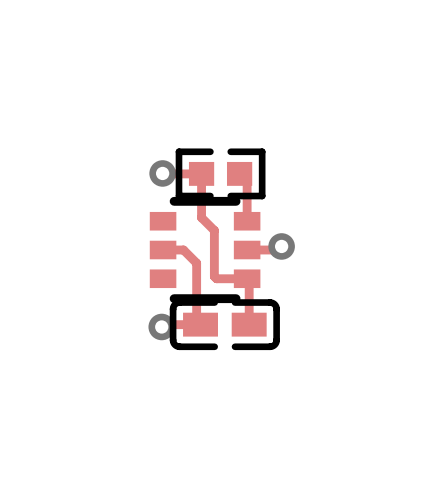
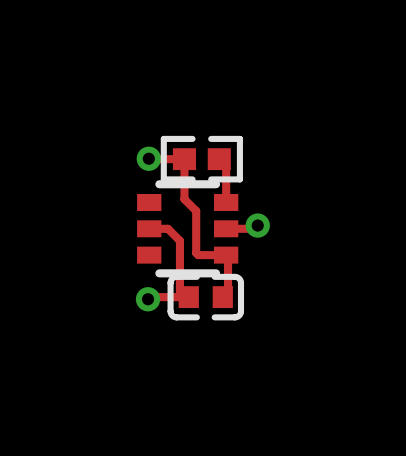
part footprint: [169, 299, 280, 351] -> [167, 273, 245, 321]

